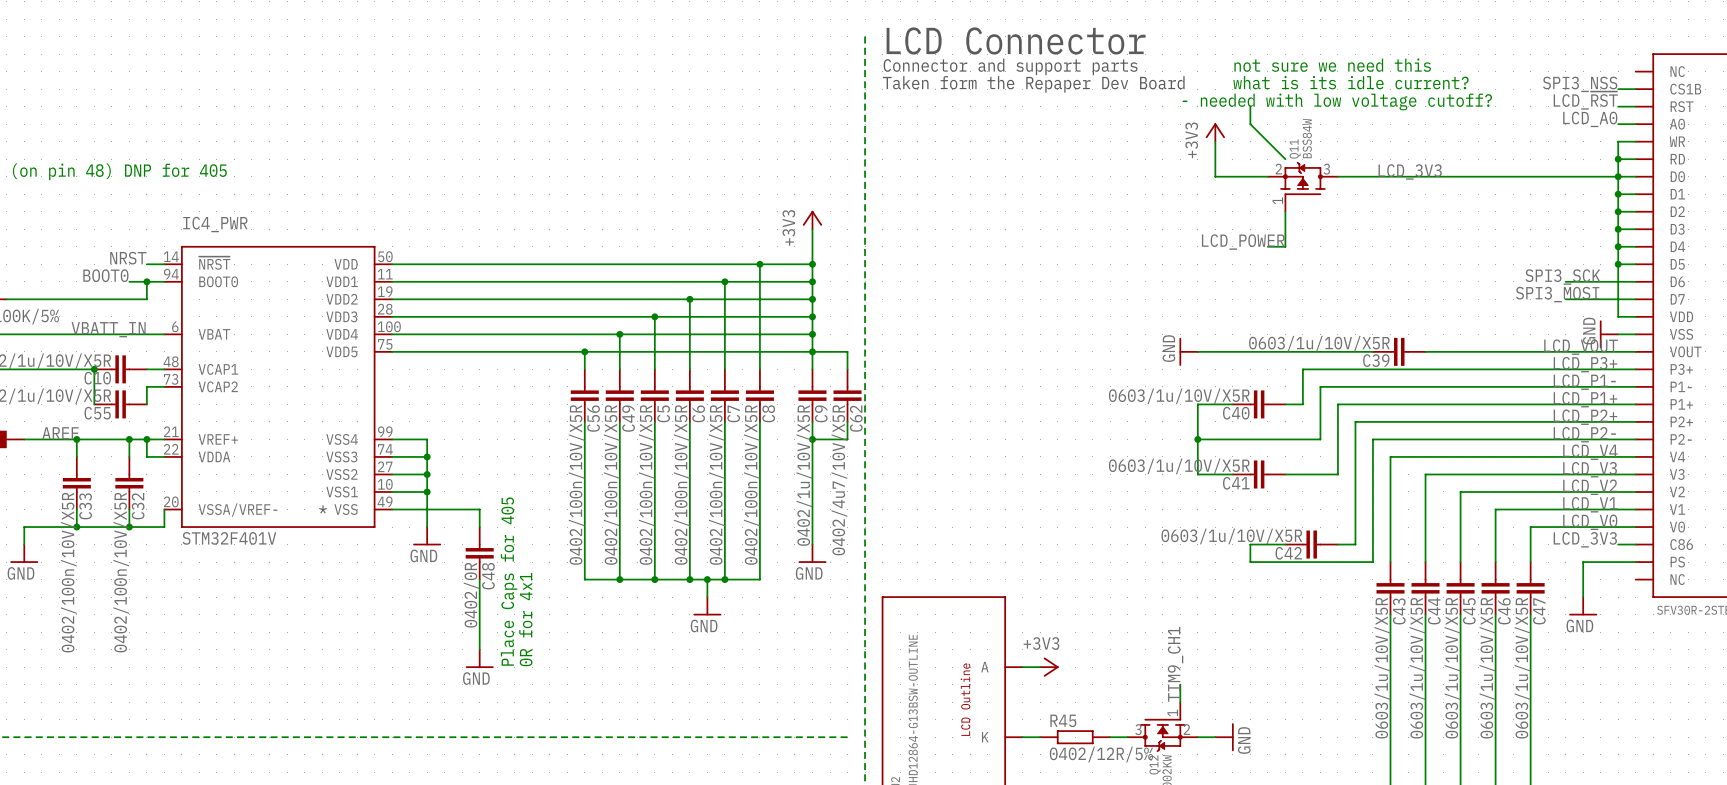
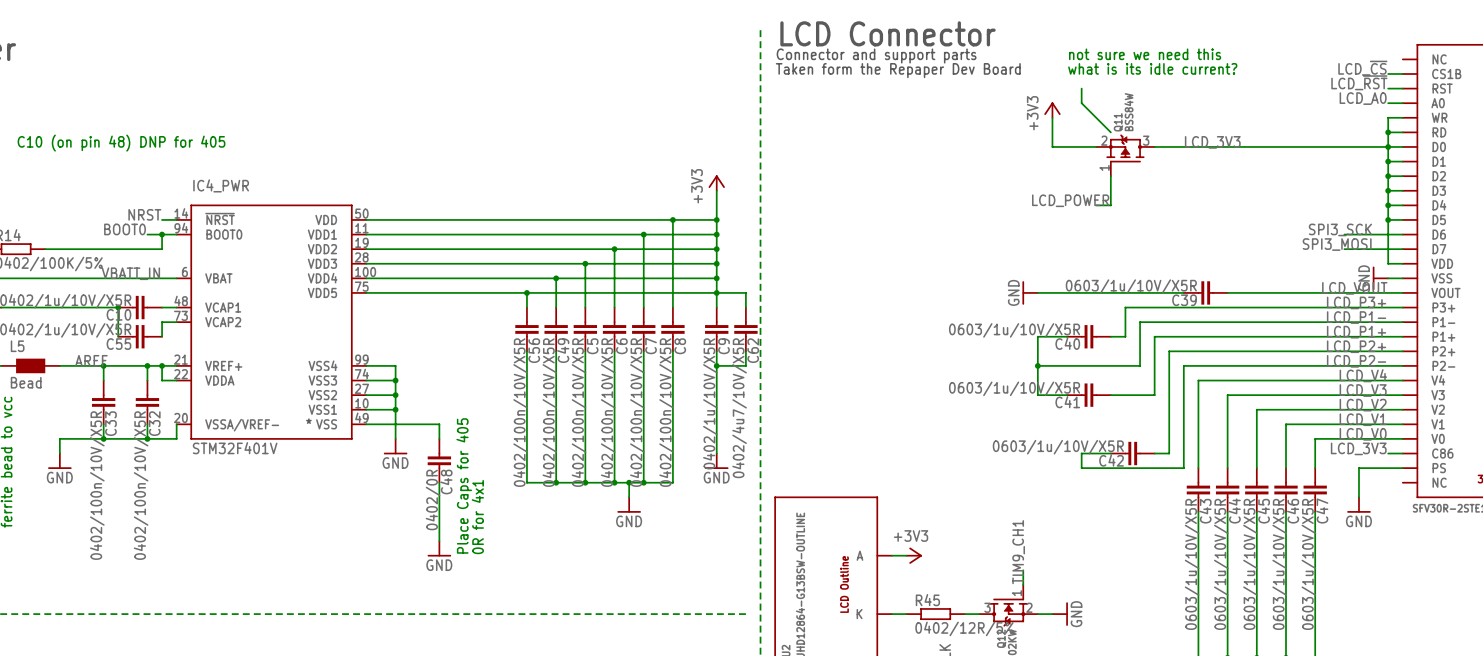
label: SPI3_NSS (1580, 84) -> LCD_~{CS} (1362, 68)
text: - needed with low voltage cutoff? (1337, 101) -> none

